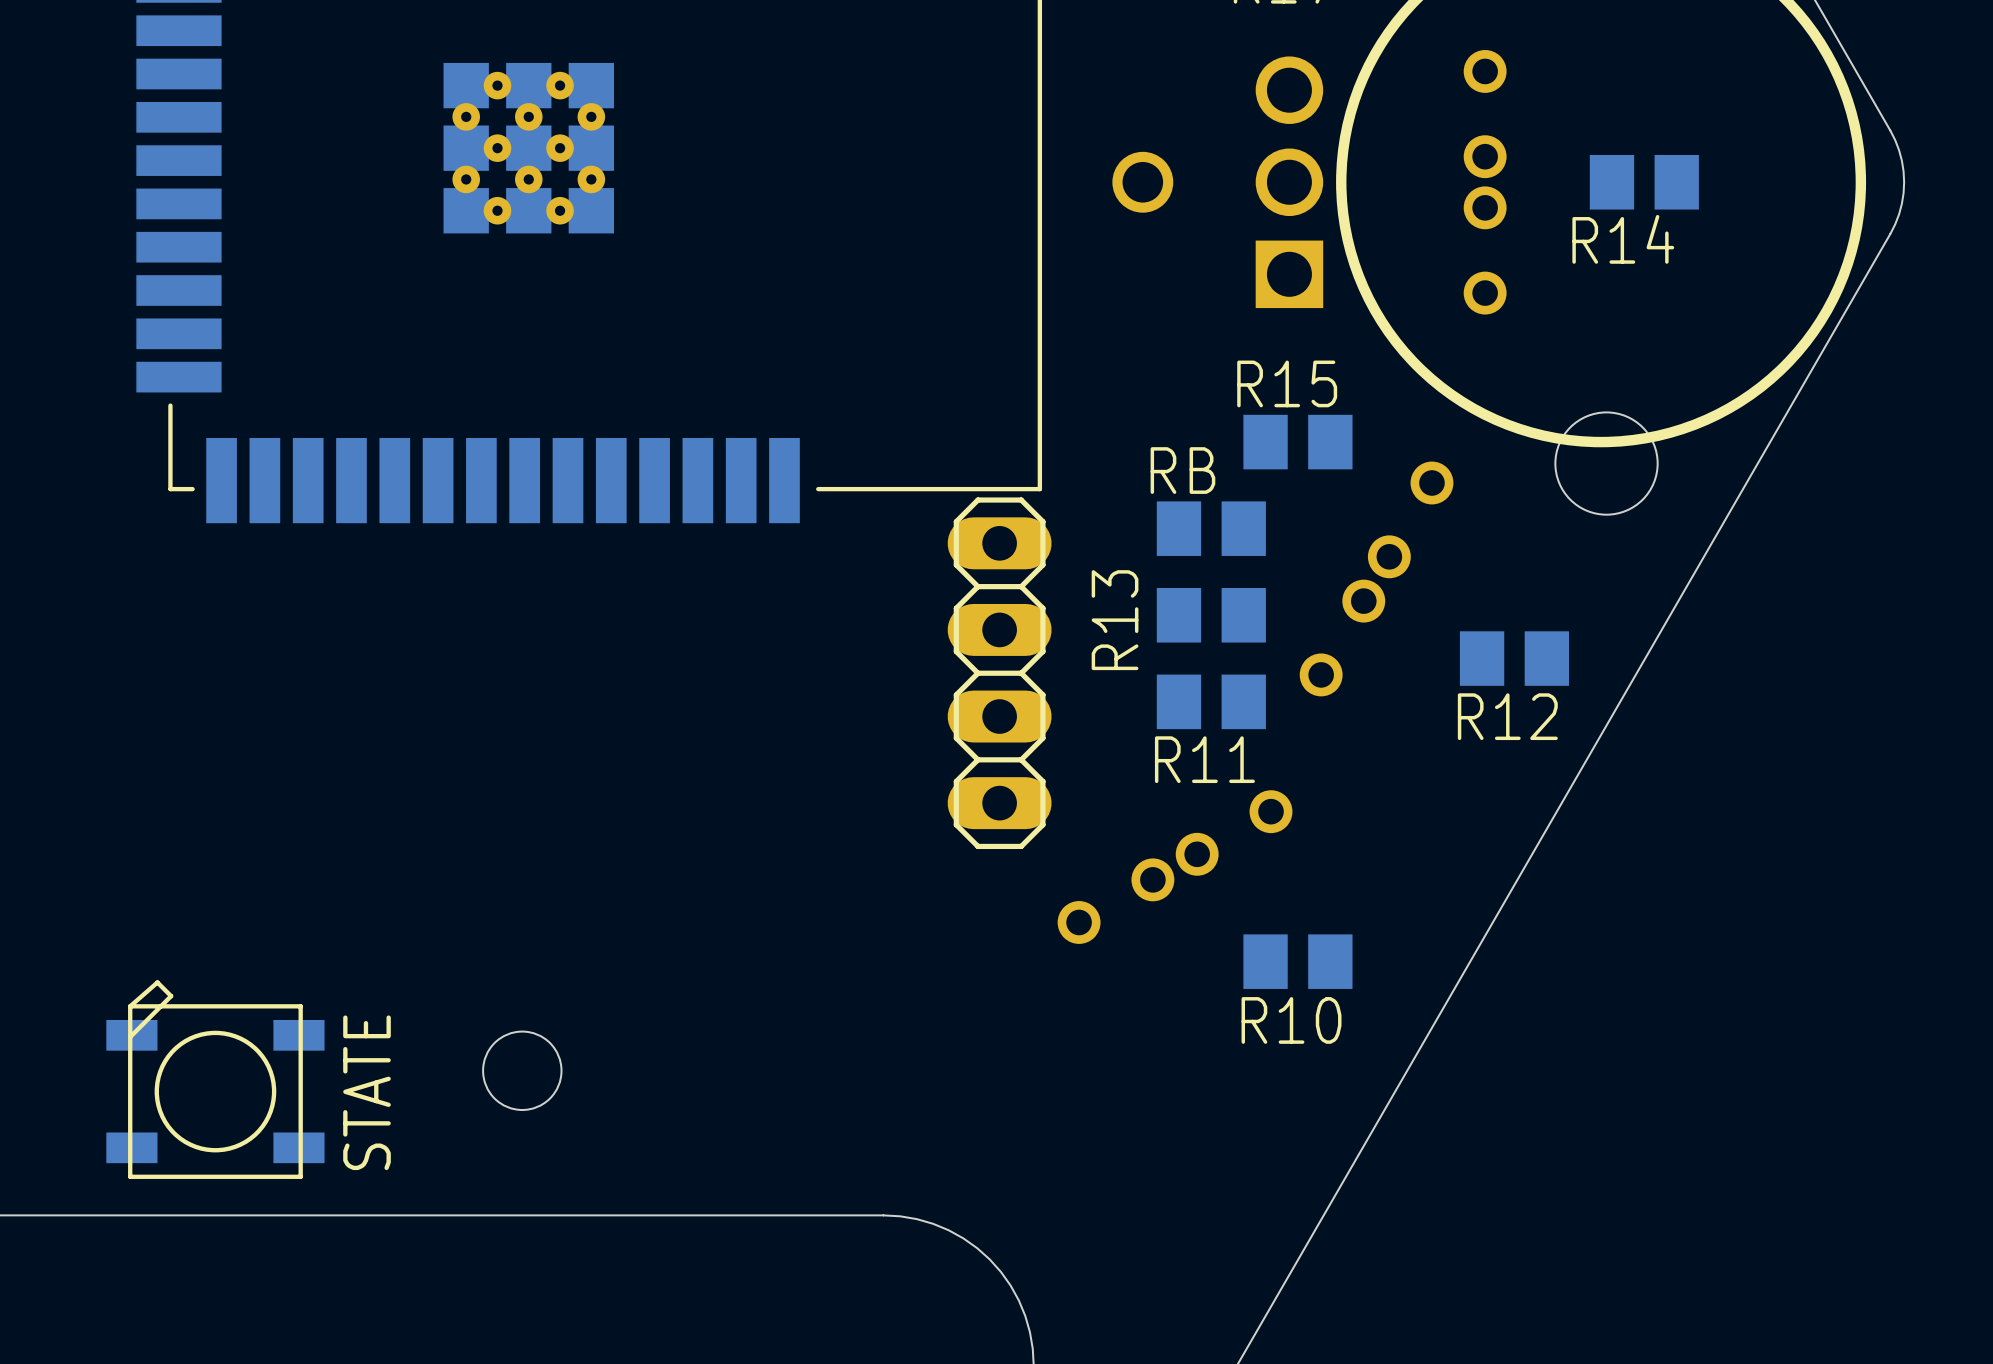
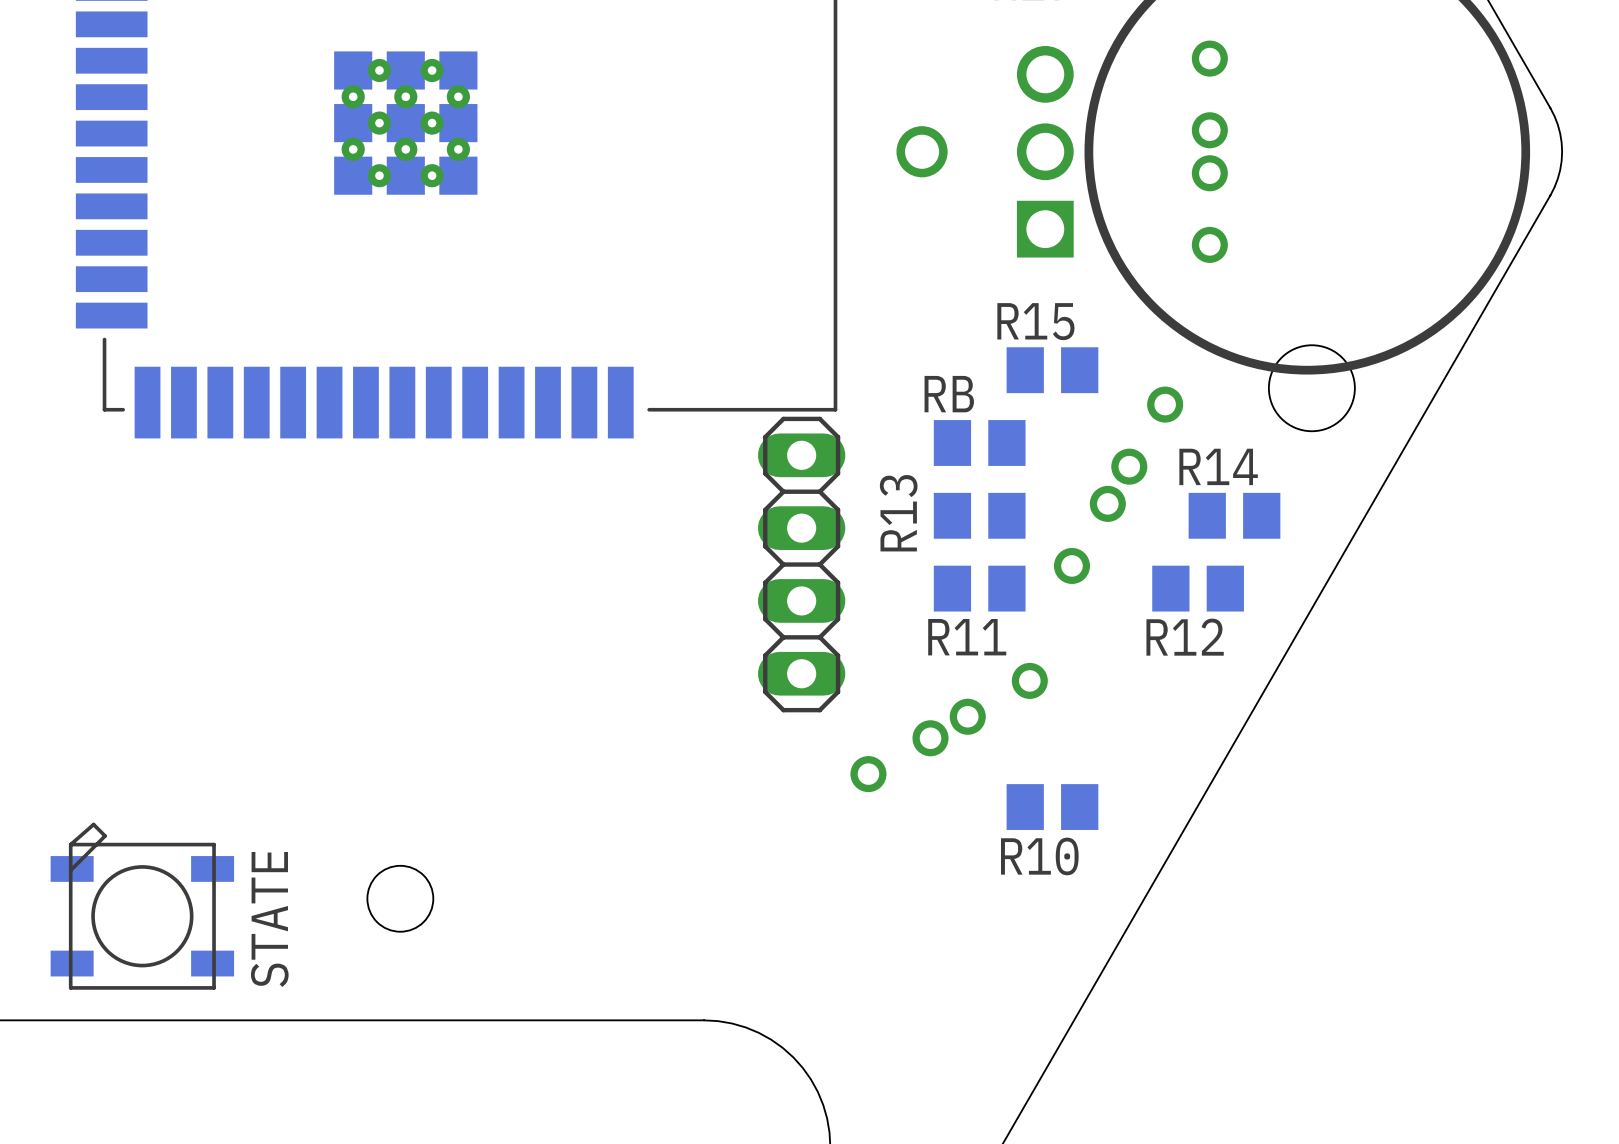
R14 position: (1644, 182) -> (1234, 515)
R14 name position: R14 (1623, 239) -> R14 (1218, 466)
R12 position: (1514, 658) -> (1198, 588)

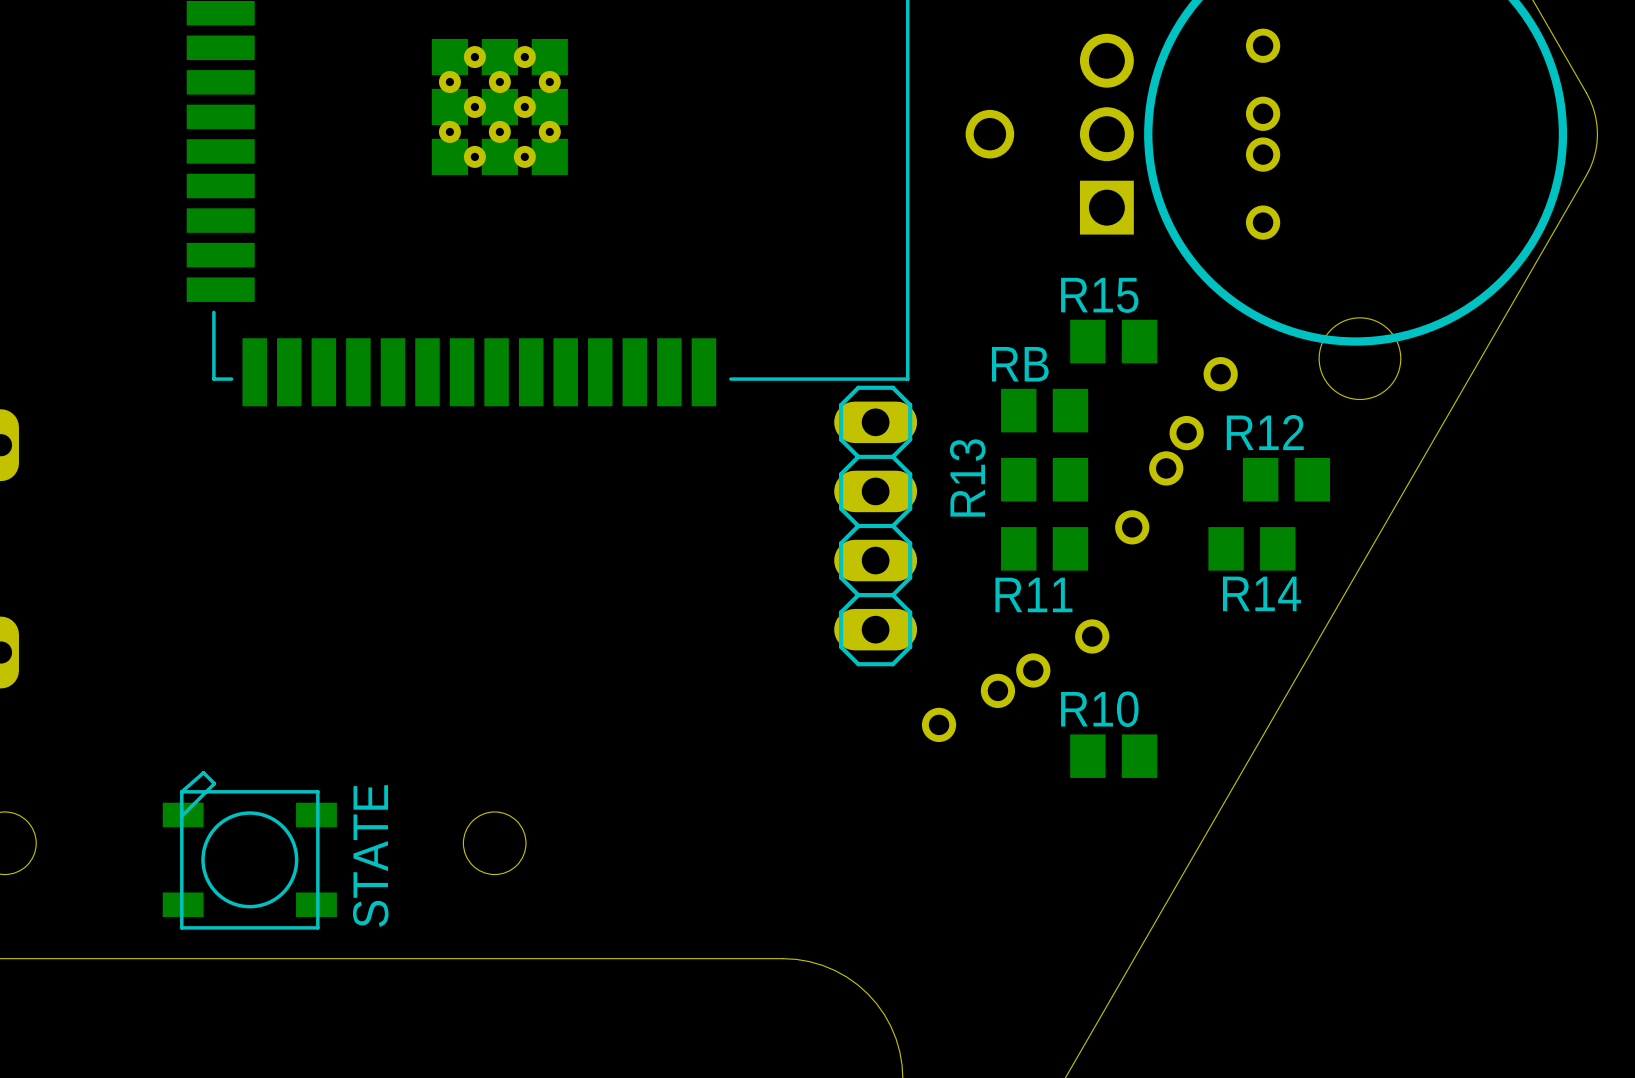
R14 name position: R14 (1218, 466) -> R14 (1261, 593)
R12 name position: R12 (1185, 637) -> R12 (1265, 432)
R10 name position: R10 (1039, 856) -> R10 (1099, 709)

